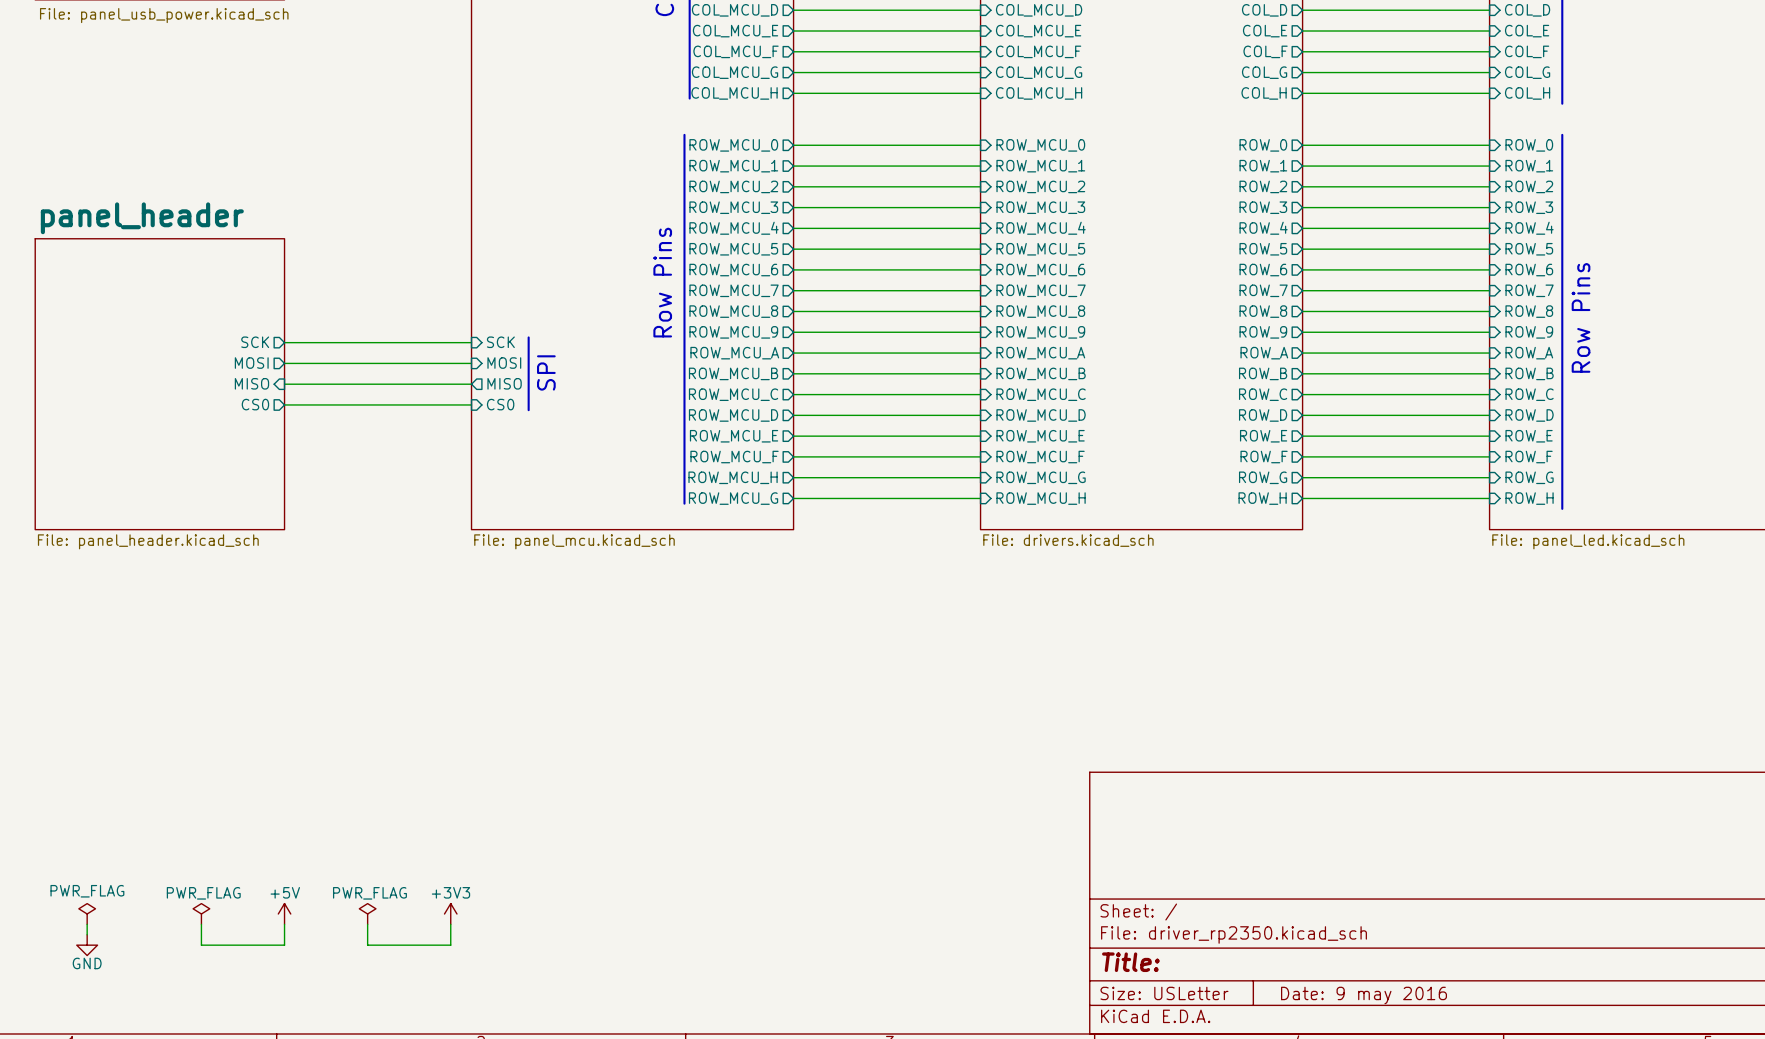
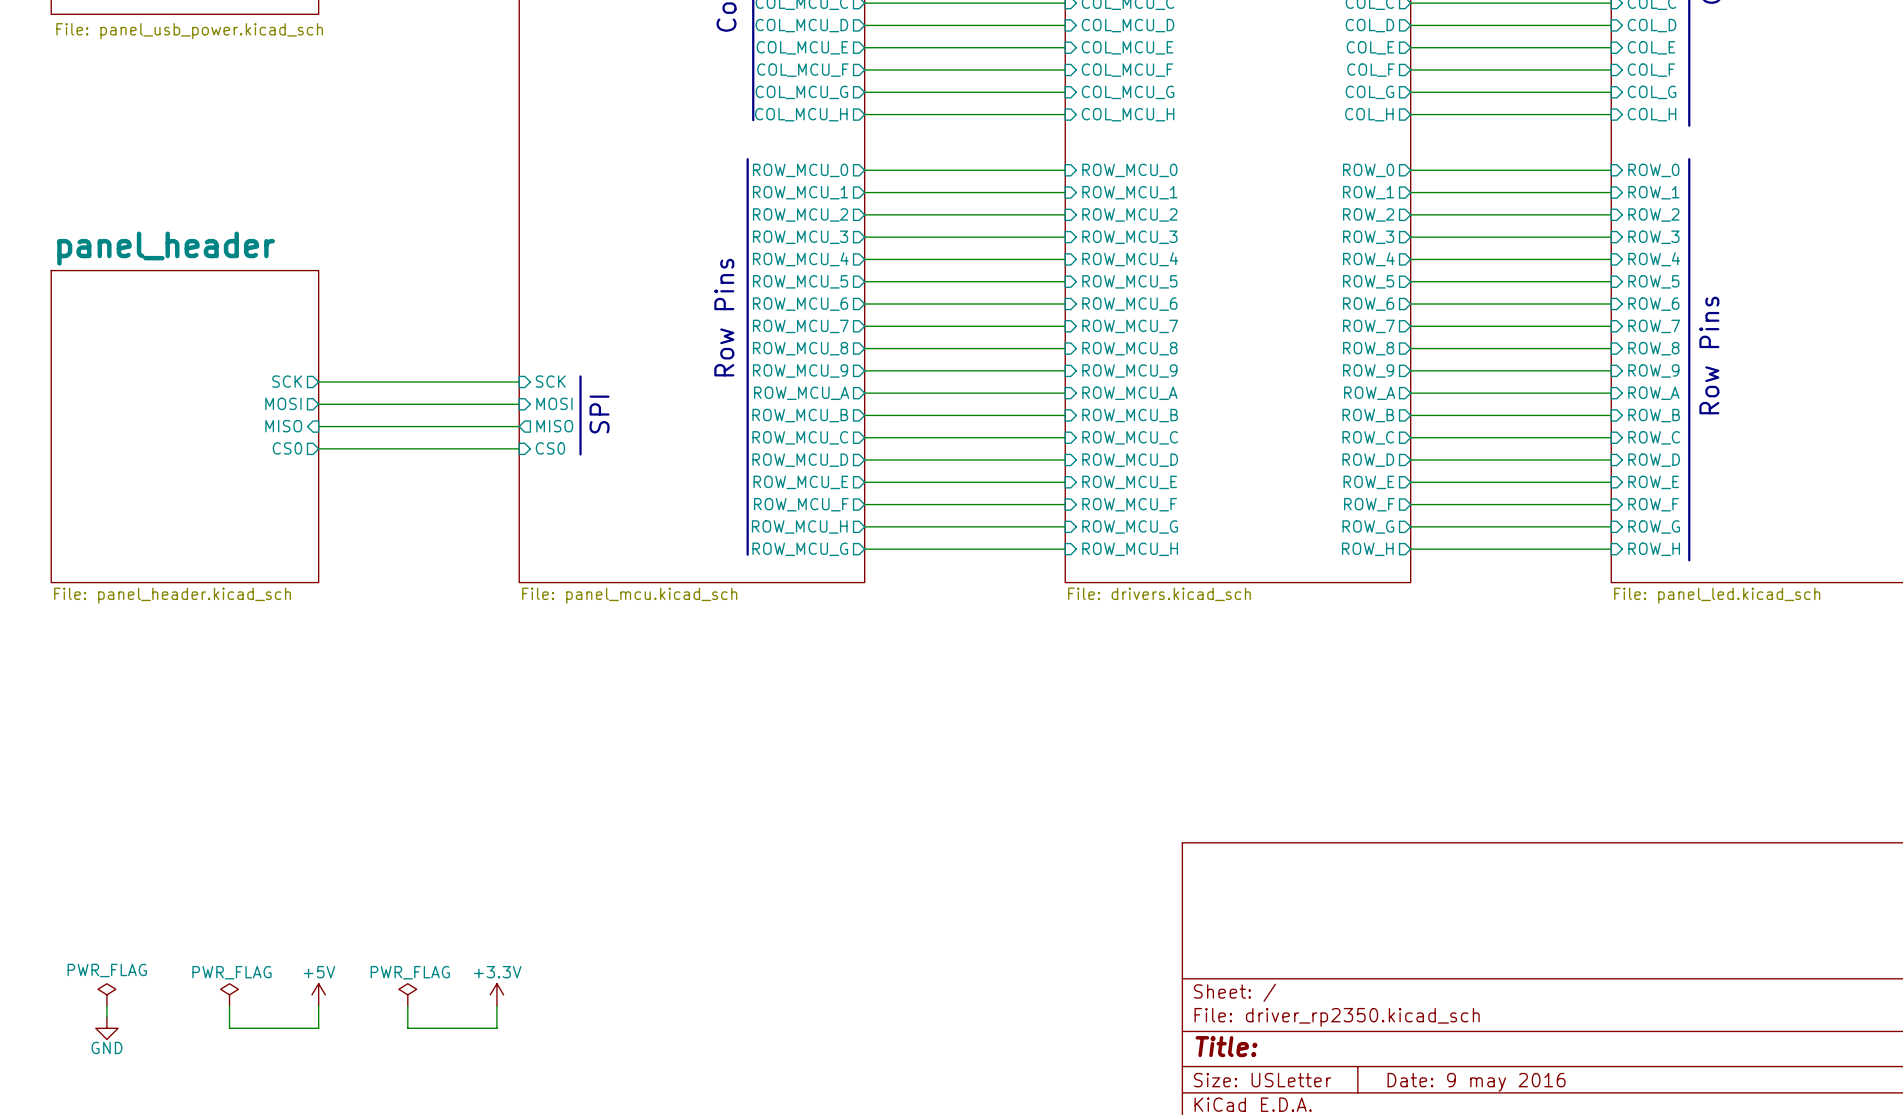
power symbol: +3V3 (450, 914) -> +3.3V (496, 994)

